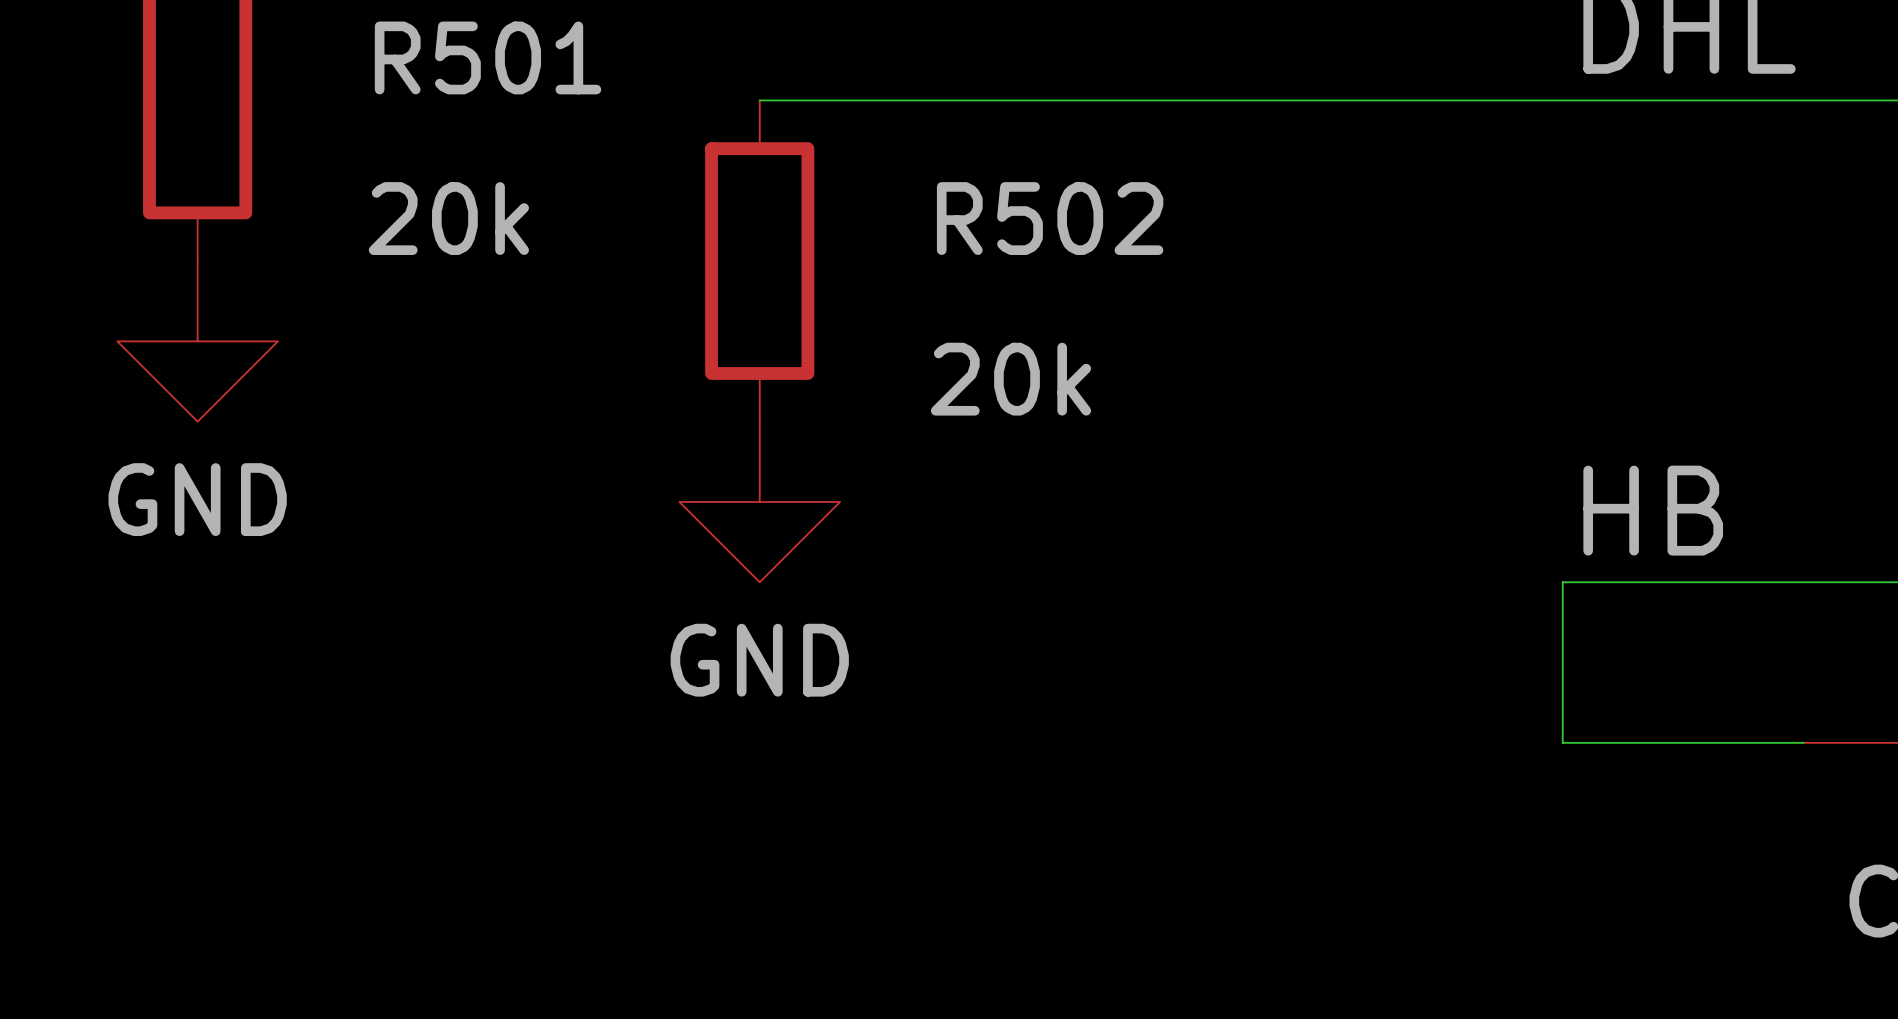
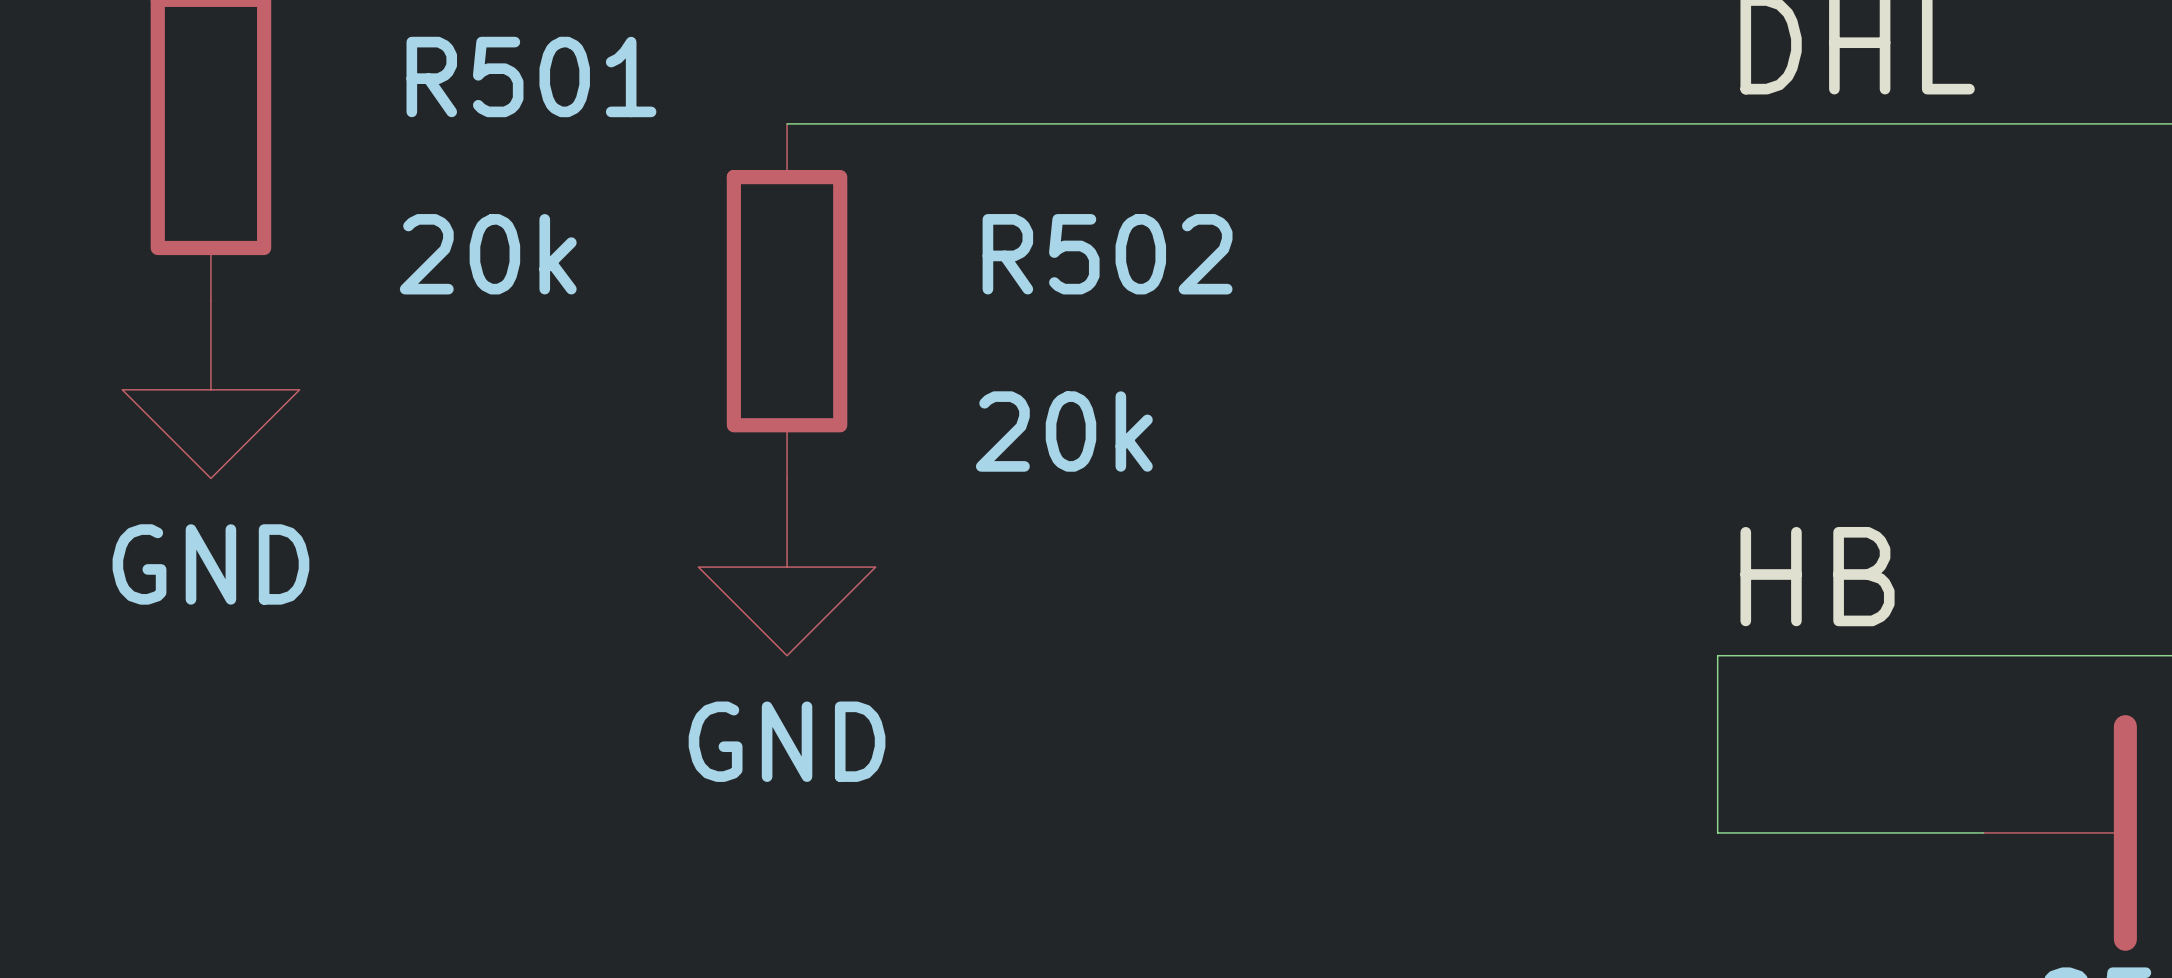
wire: none -> (787, 123) (831, 123)
R502 position: (759, 261) -> (787, 301)
power symbol position: GND (759, 501) -> GND (787, 567)

